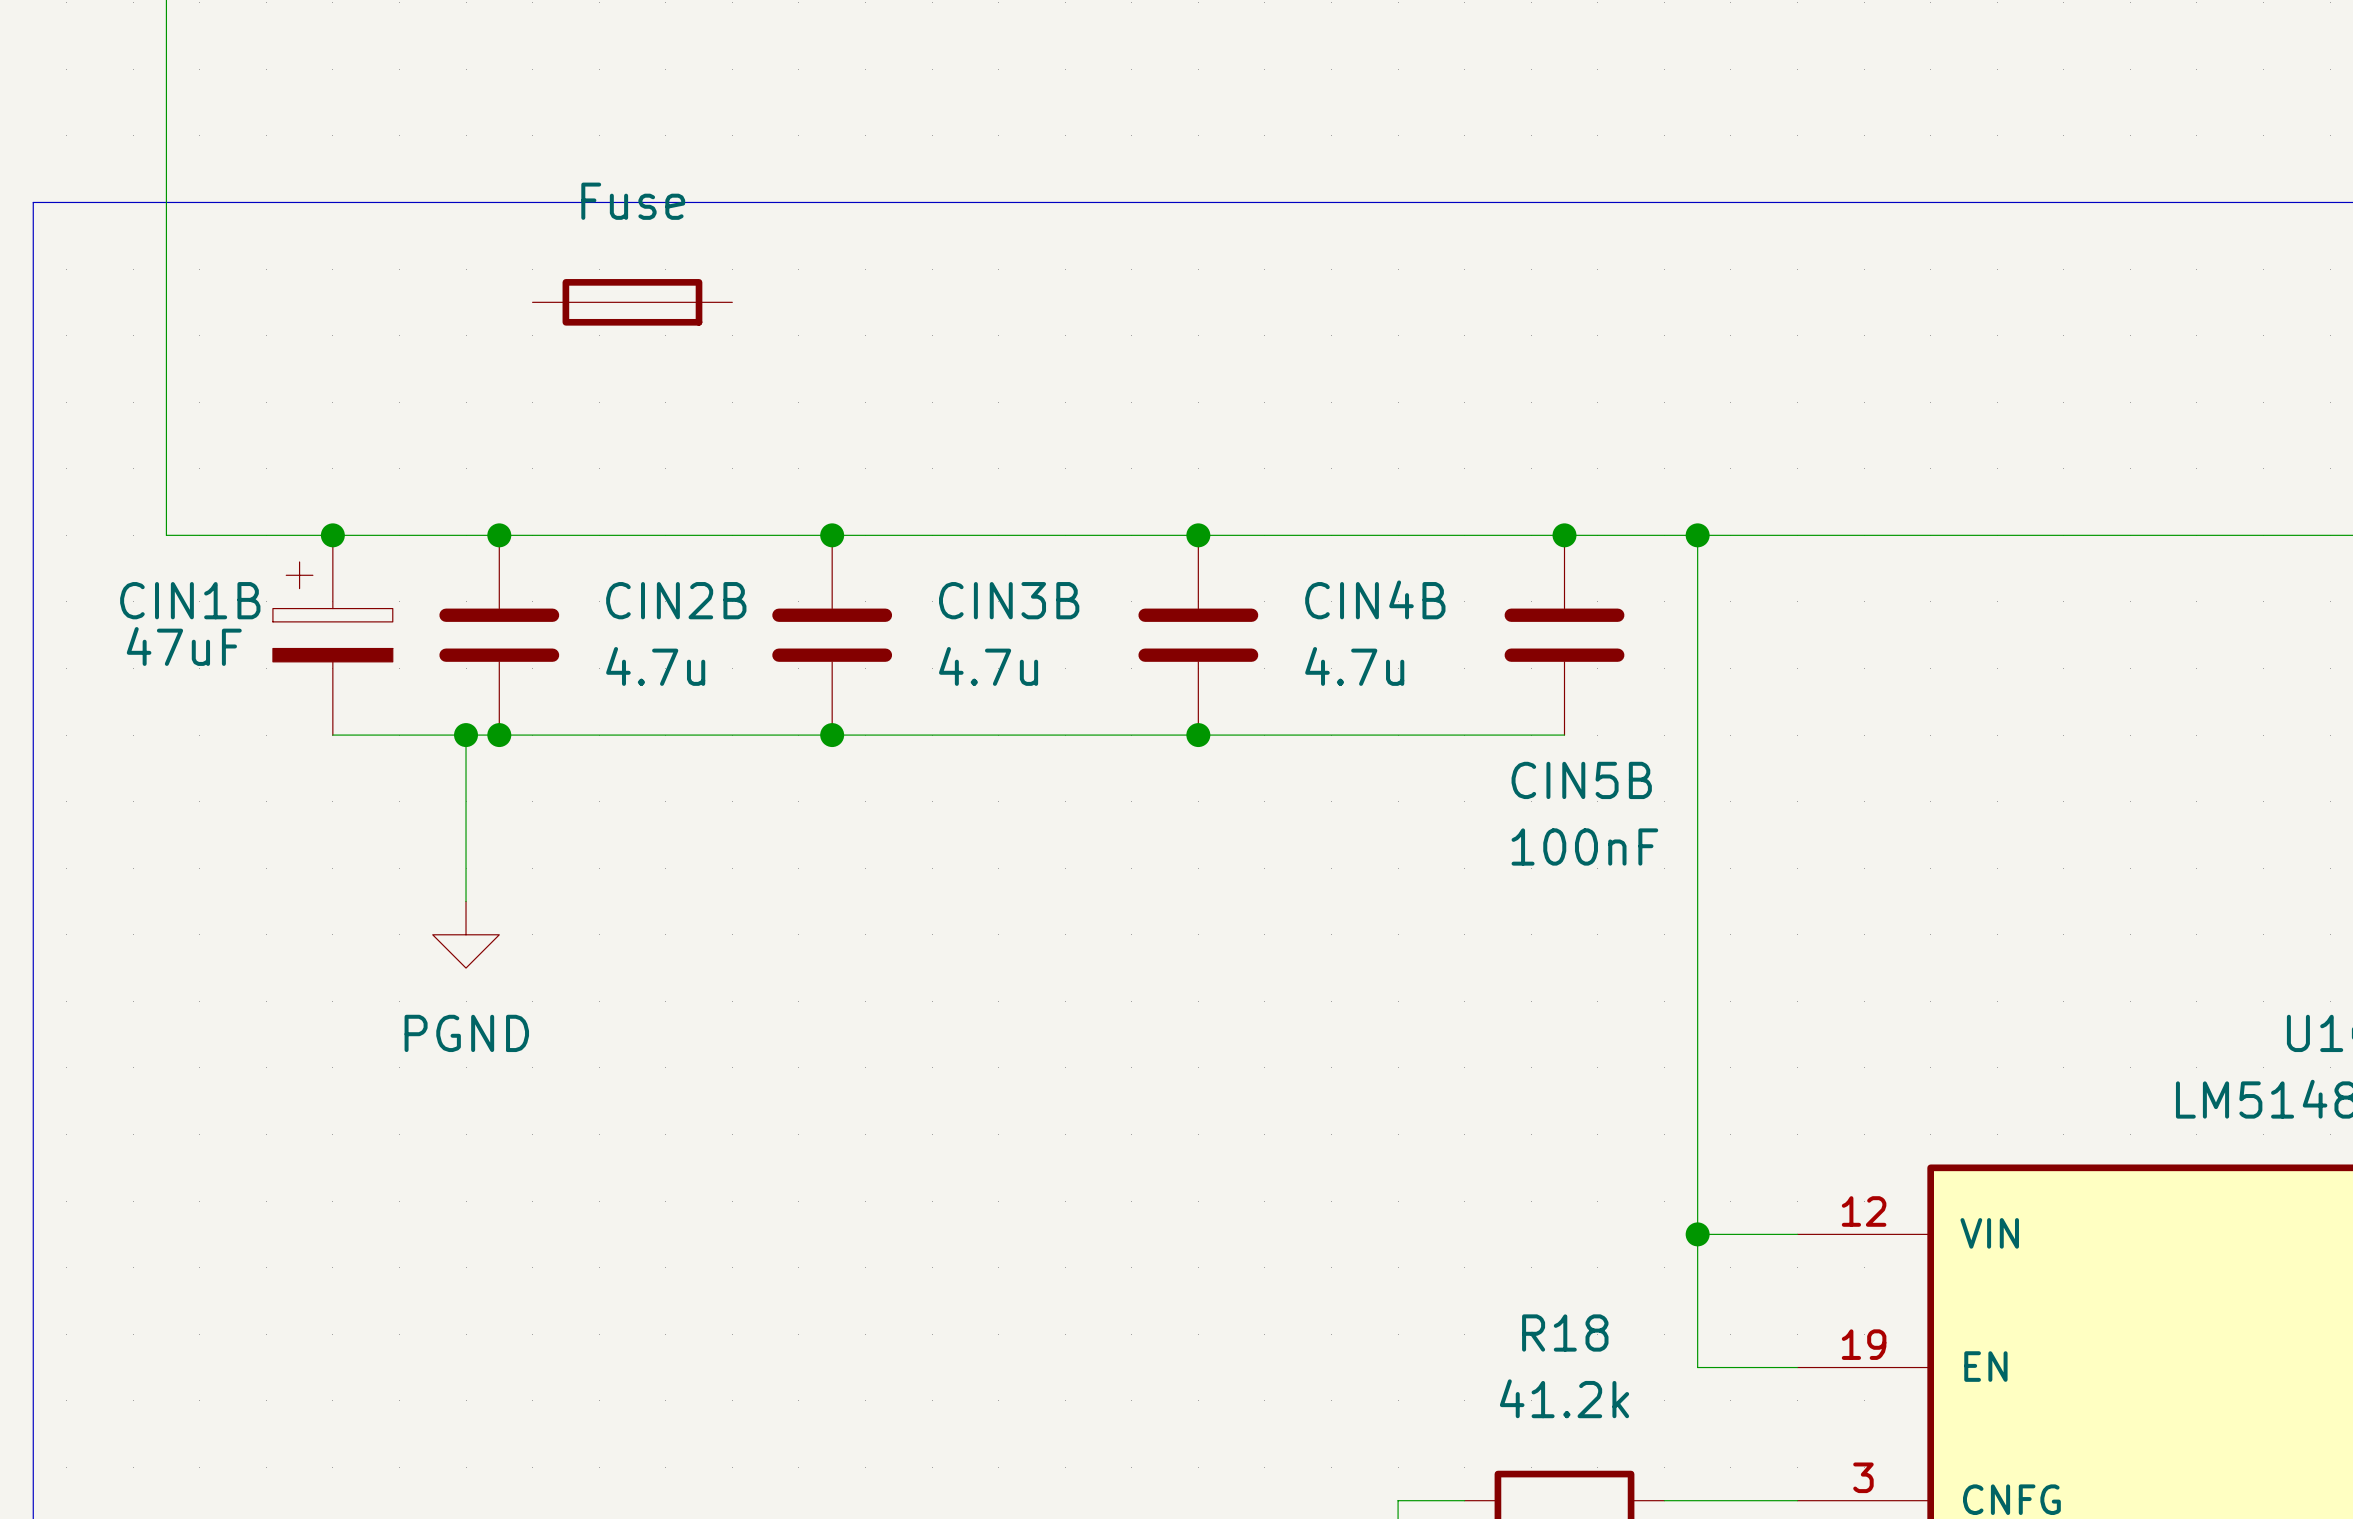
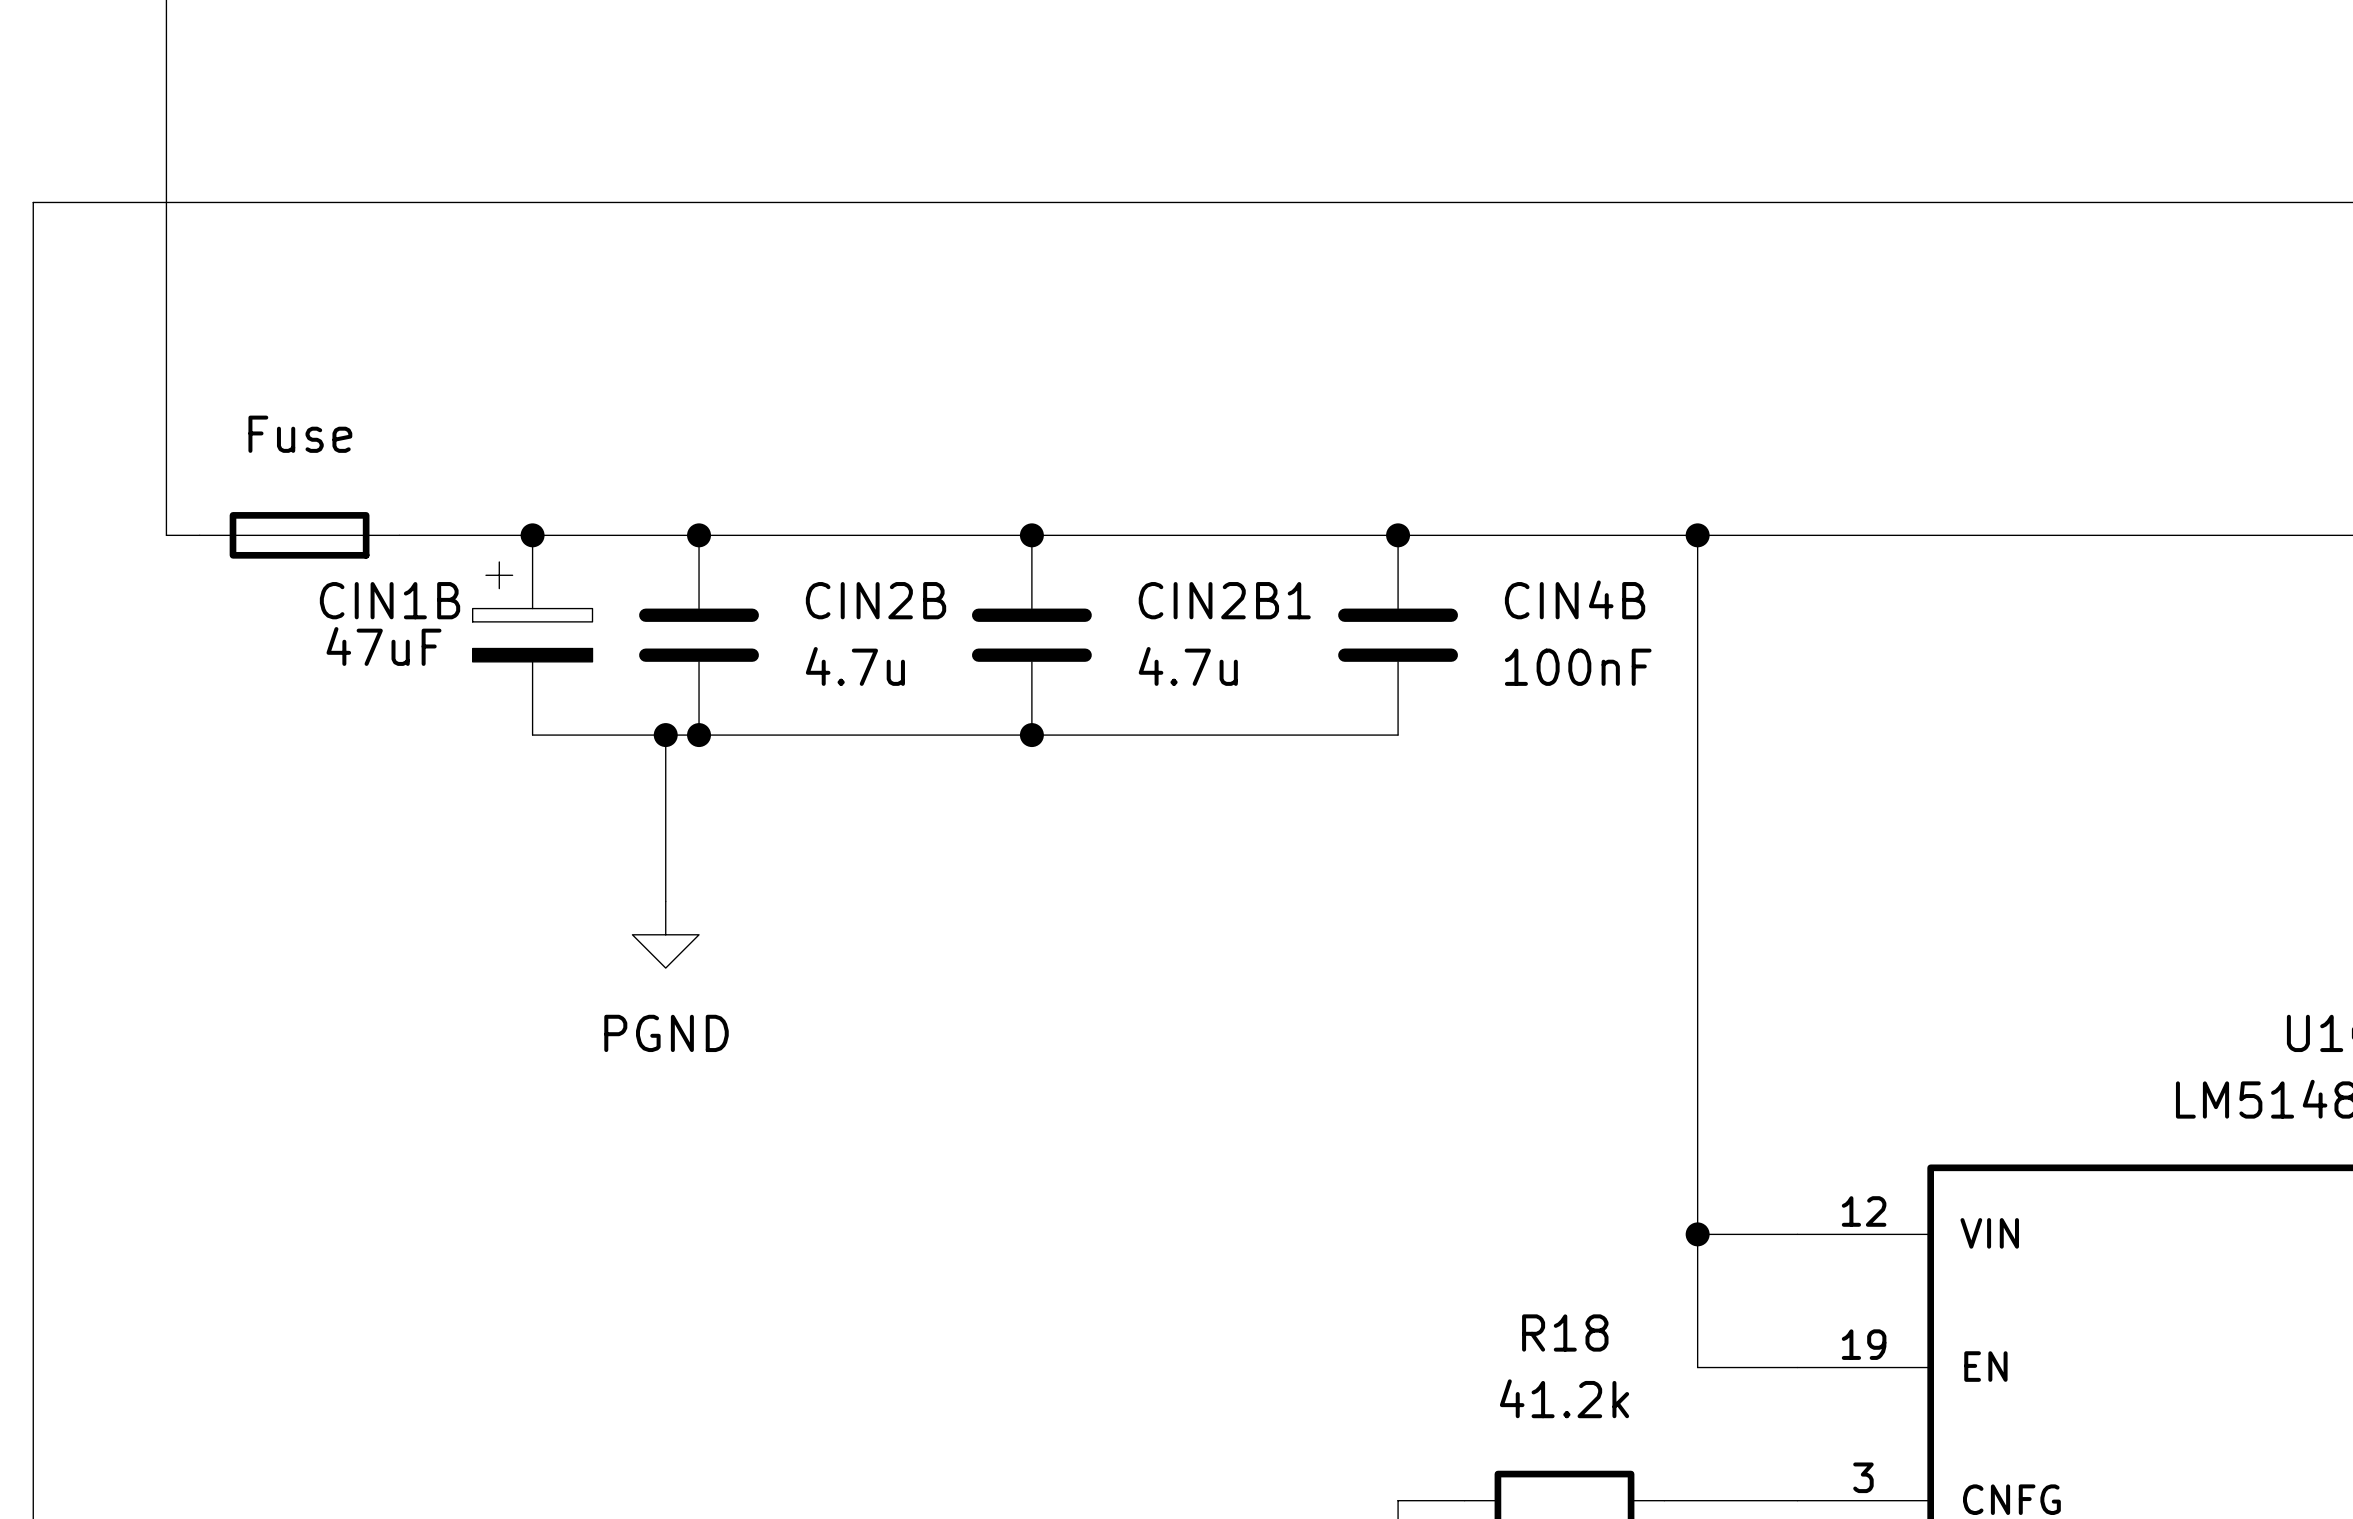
part position: (632, 302) -> (299, 535)
junction: (332, 535) -> none
junction position: (499, 535) -> (532, 535)
junction: none -> (699, 535)
junction: (832, 535) -> none
junction: none -> (1031, 535)
junction: (1198, 535) -> none
junction: none -> (1398, 535)
junction: (1564, 535) -> none
CIN1B position: (332, 635) -> (532, 635)
CIN2B position: (499, 635) -> (699, 635)
CIN3B: 4.7u (832, 635) -> none
CIN2B1: none -> 4.7u (1031, 635)
CIN4B position: (1198, 635) -> (1398, 635)
CIN5B: 100nF (1564, 635) -> none
CIN4B value: 4.7u (1354, 666) -> 100nF (1578, 667)
wire: (332, 735) (532, 735) -> none
wire: (466, 735) (466, 901) -> (665, 735) (665, 901)
junction: (466, 735) -> none
junction: (499, 735) -> none
junction: none -> (665, 735)
junction: none -> (699, 735)
junction: (832, 735) -> none
junction: none -> (1031, 735)
junction: (1198, 735) -> none
wire: (1398, 735) (1564, 735) -> none
power symbol position: PGND (466, 934) -> PGND (665, 934)

